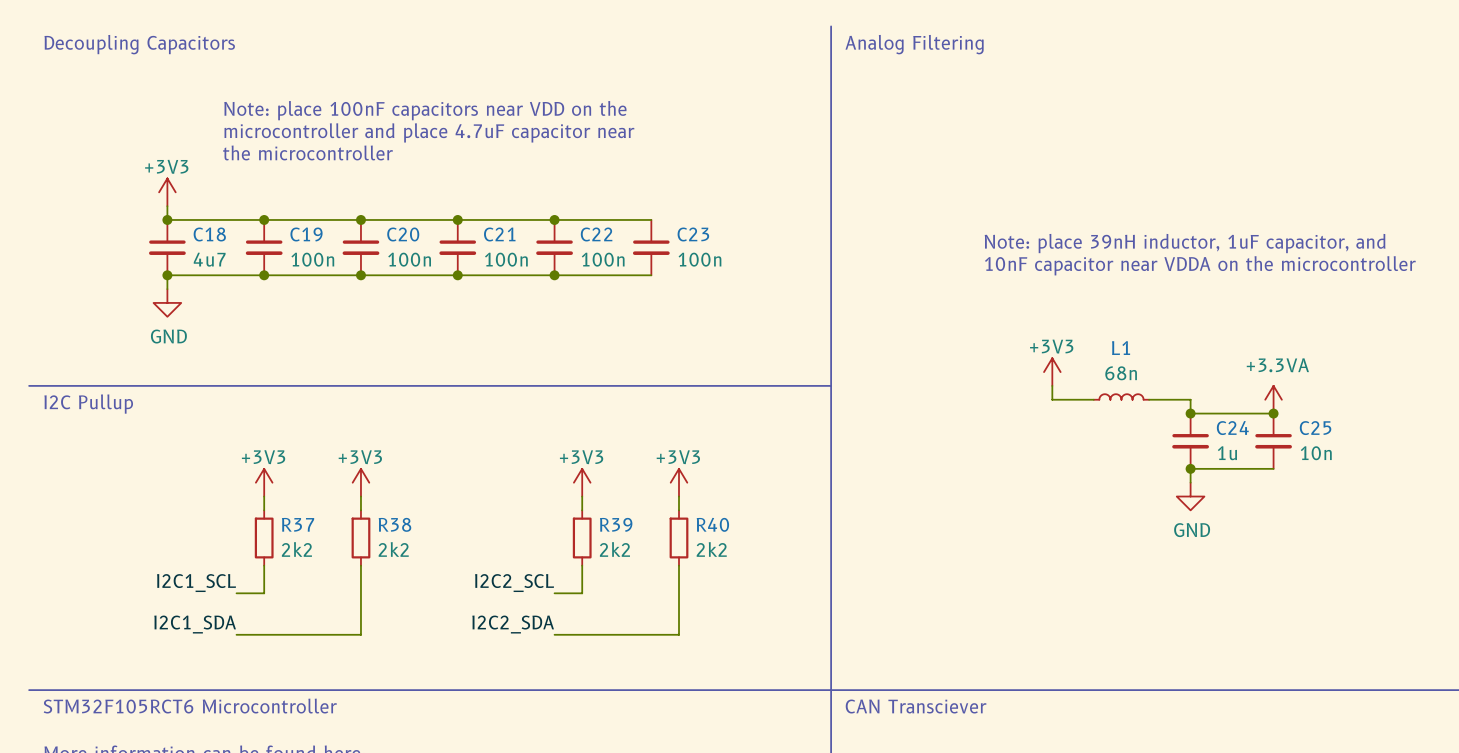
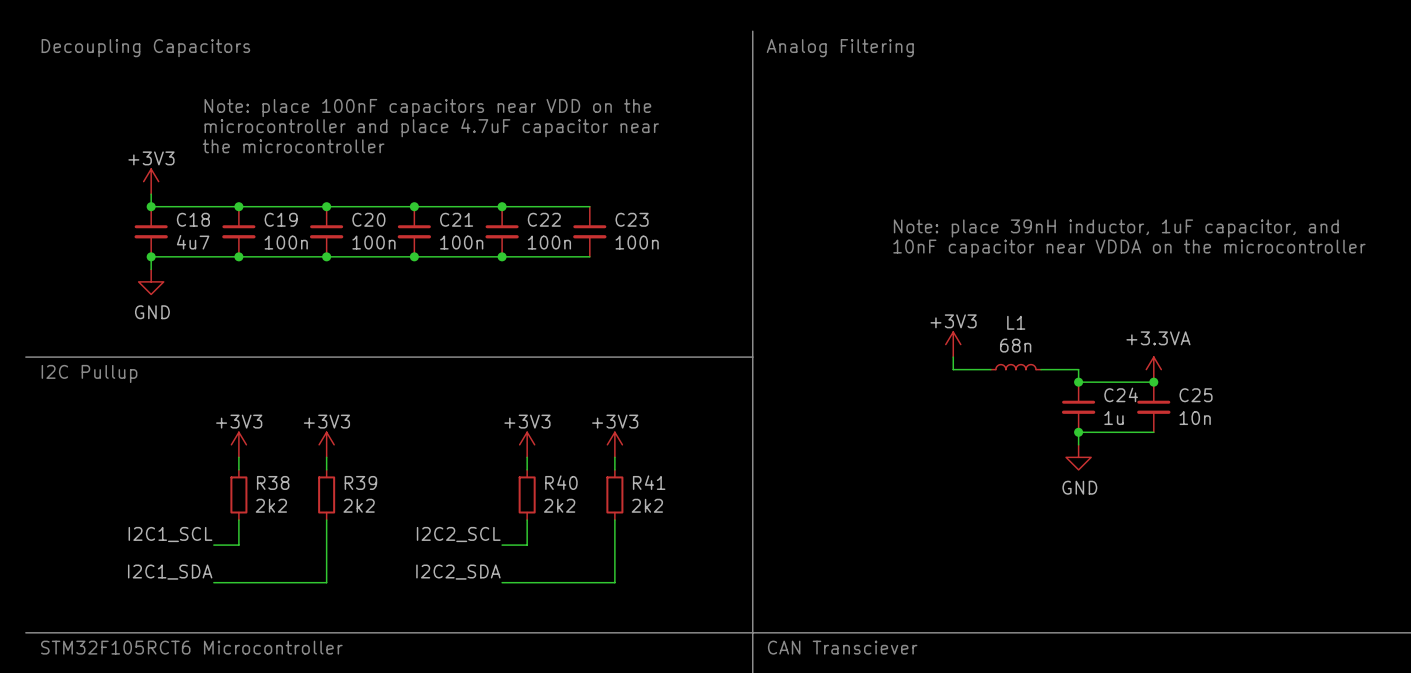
R37 name: R37 (298, 524) -> R38 (273, 482)
R38 name: R38 (394, 524) -> R39 (360, 482)
R39 name: R39 (616, 524) -> R40 (561, 482)
R40 name: R40 (712, 524) -> R41 (649, 482)

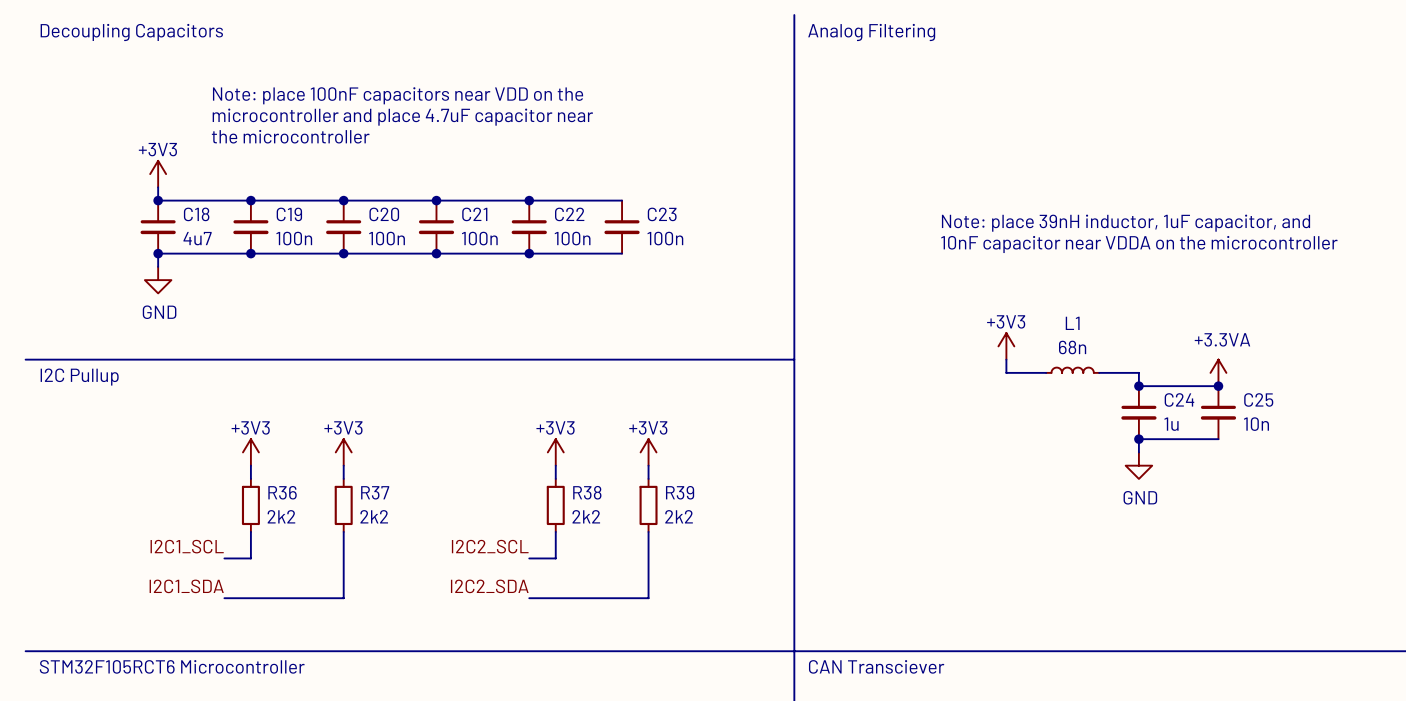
R38 name: R38 (273, 482) -> R36 (282, 492)
R39 name: R39 (360, 482) -> R37 (375, 492)
R40 name: R40 (561, 482) -> R38 (587, 492)
R41 name: R41 (649, 482) -> R39 (680, 492)

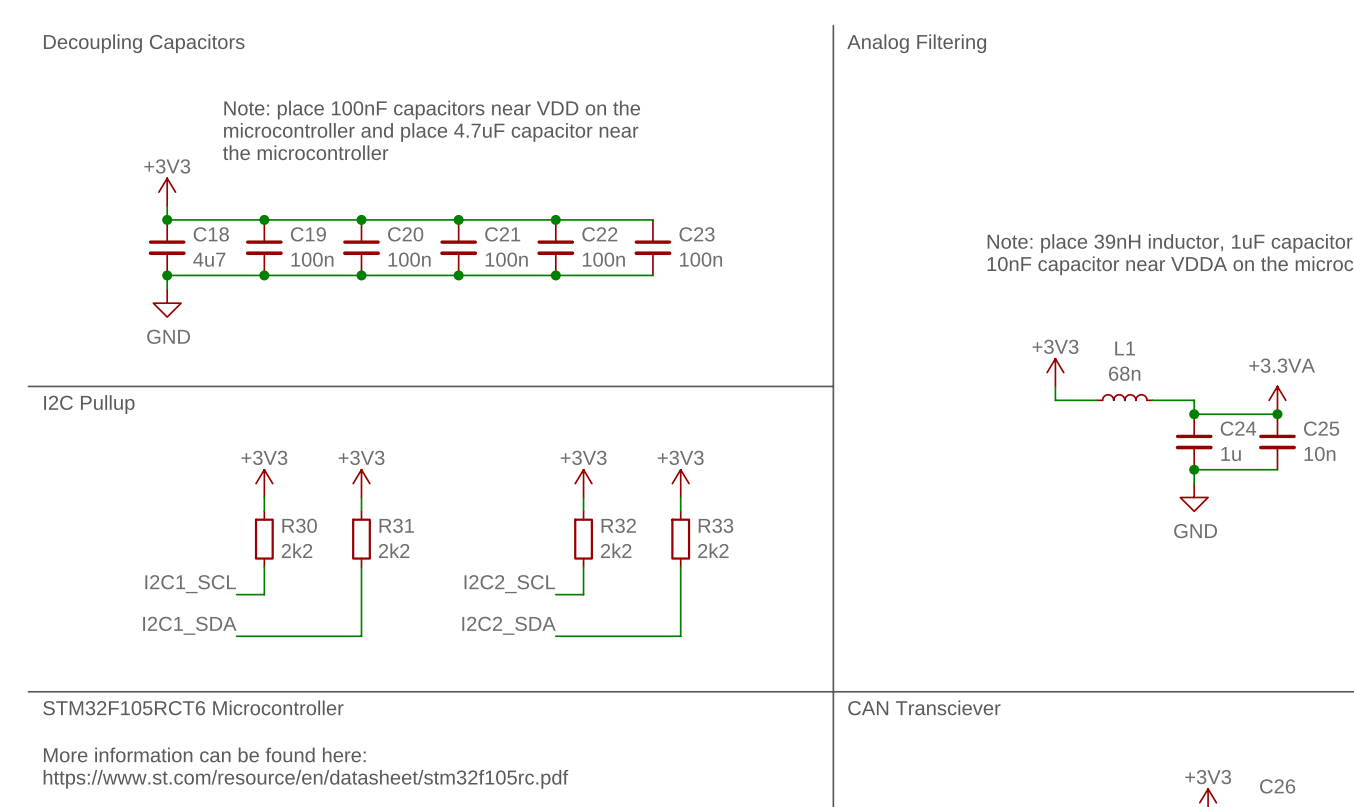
R36 name: R36 (282, 492) -> R30 (299, 525)
R37 name: R37 (375, 492) -> R31 (396, 525)
R38 name: R38 (587, 492) -> R32 (618, 525)
R39 name: R39 (680, 492) -> R33 (715, 525)

